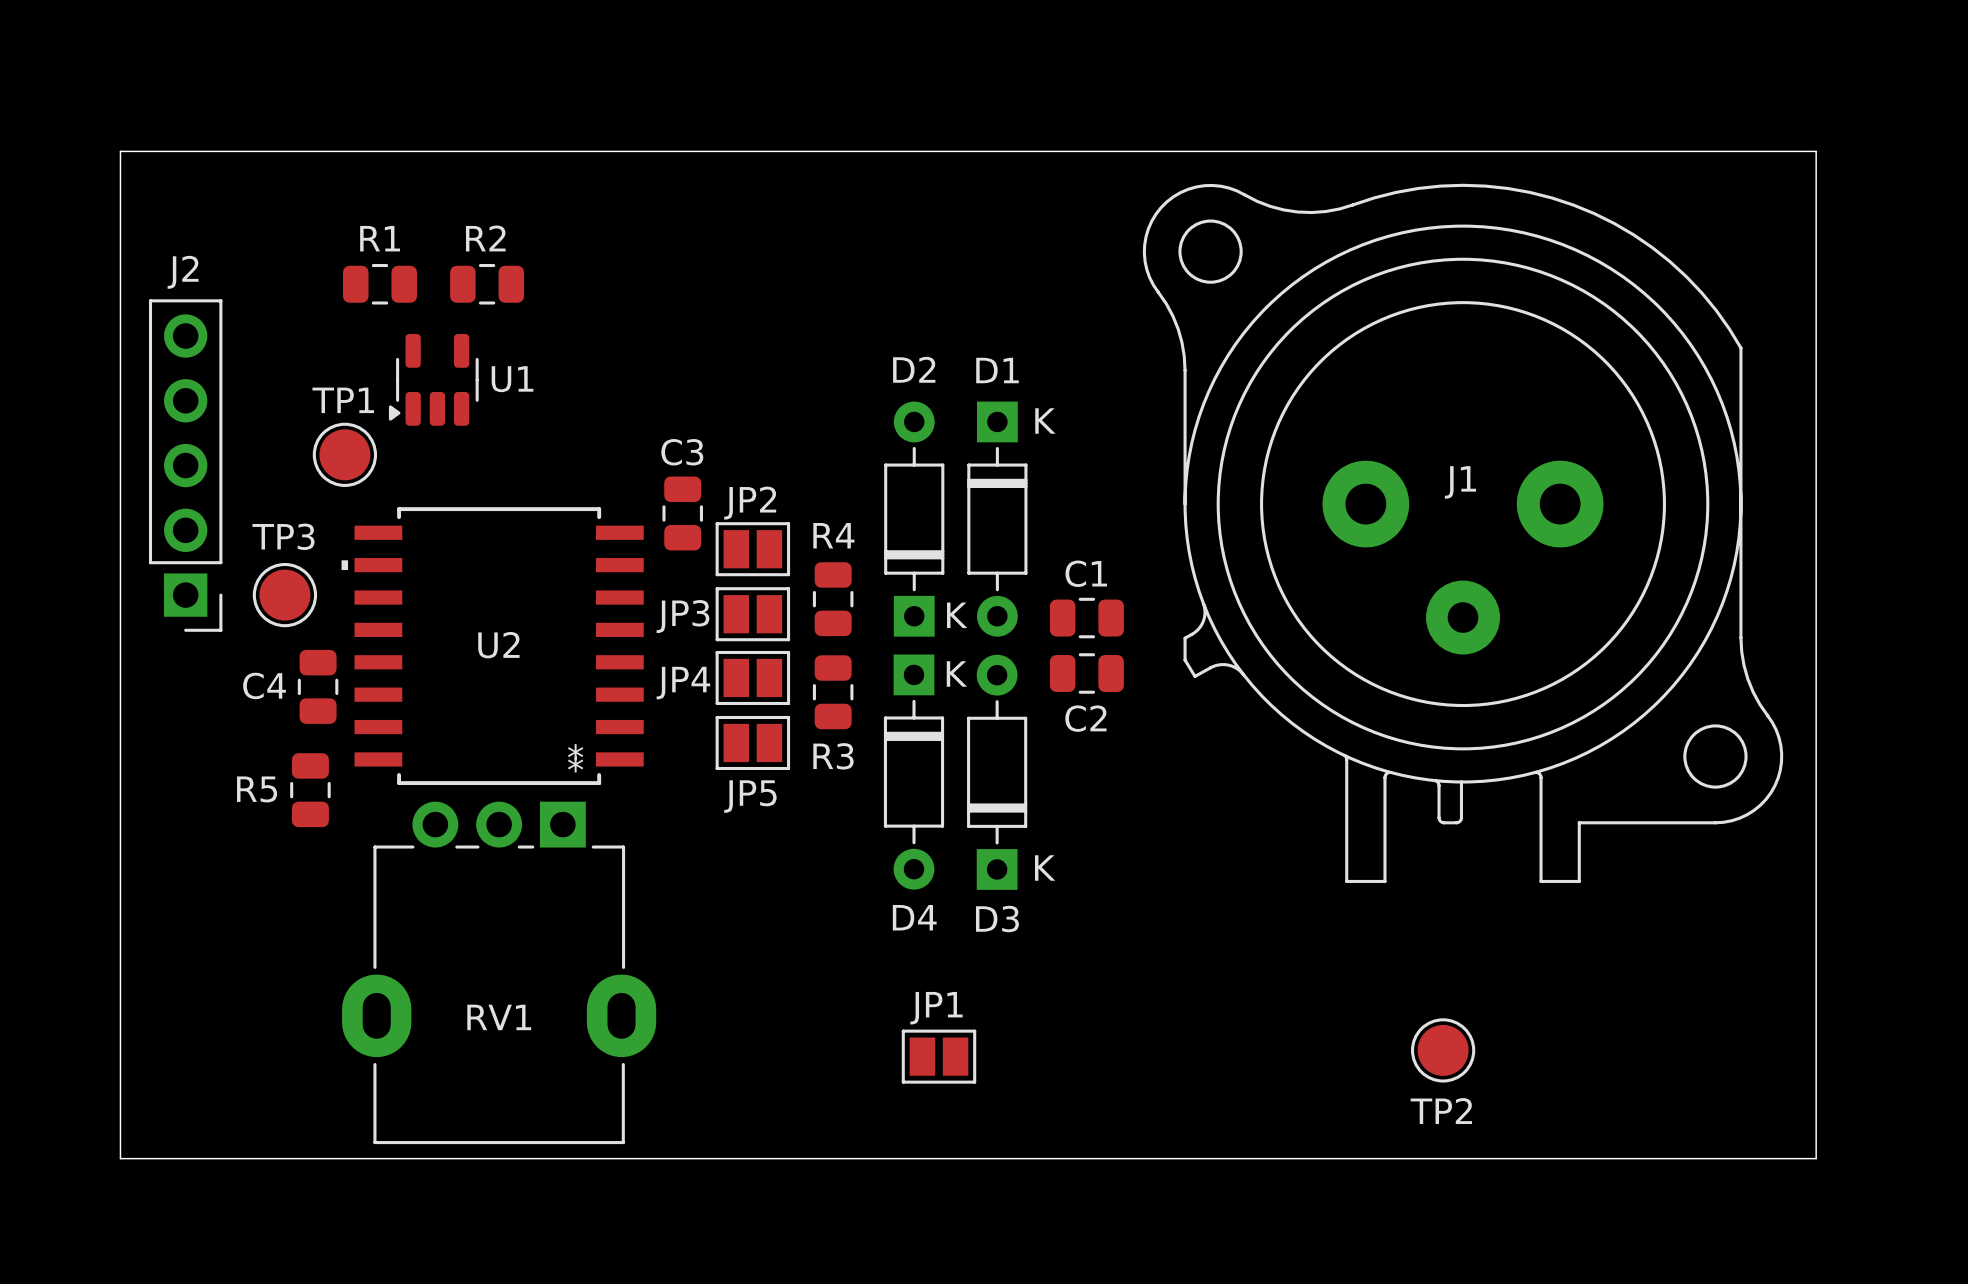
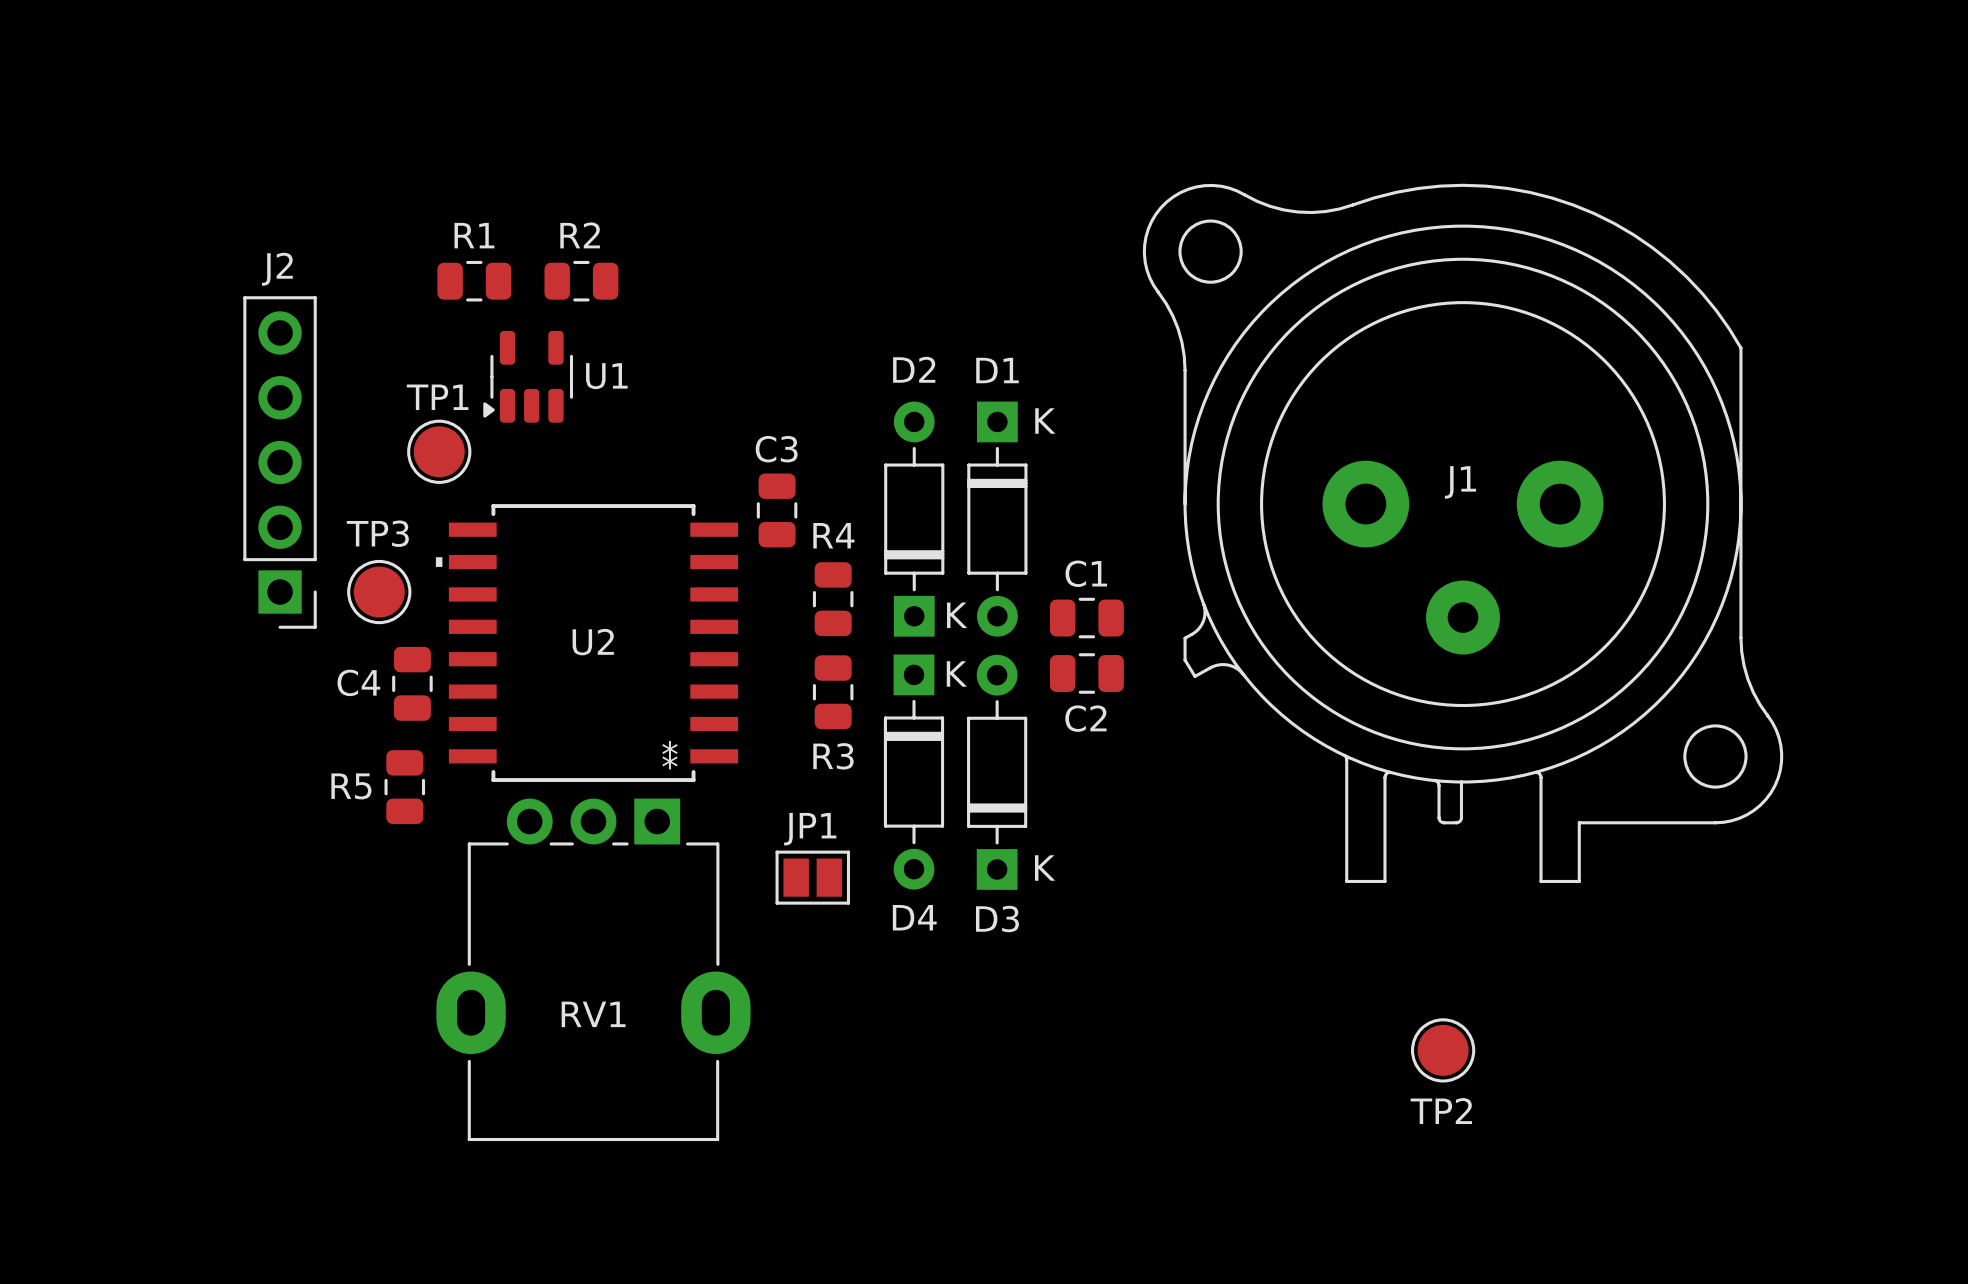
board edge: (120, 151) (1816, 151) (1816, 1158) (120, 1158) (120, 151) -> none
R1 position: (379, 284) -> (474, 281)
R2 position: (487, 284) -> (581, 281)
U1 position: (433, 379) -> (528, 376)
TP1 position: (344, 454) -> (439, 451)
J2 position: (185, 465) -> (280, 462)
C3 position: (682, 513) -> (777, 510)
JP2: (752, 549) -> none
TP3 position: (284, 595) -> (379, 592)
JP3: (752, 614) -> none
U2 position: (492, 646) -> (587, 643)
JP4: (752, 677) -> none
C4 position: (318, 686) -> (412, 683)
JP5: (752, 742) -> none
R5 position: (310, 790) -> (404, 787)
RV1 position: (499, 972) -> (593, 969)
JP1 position: (938, 1056) -> (812, 877)

